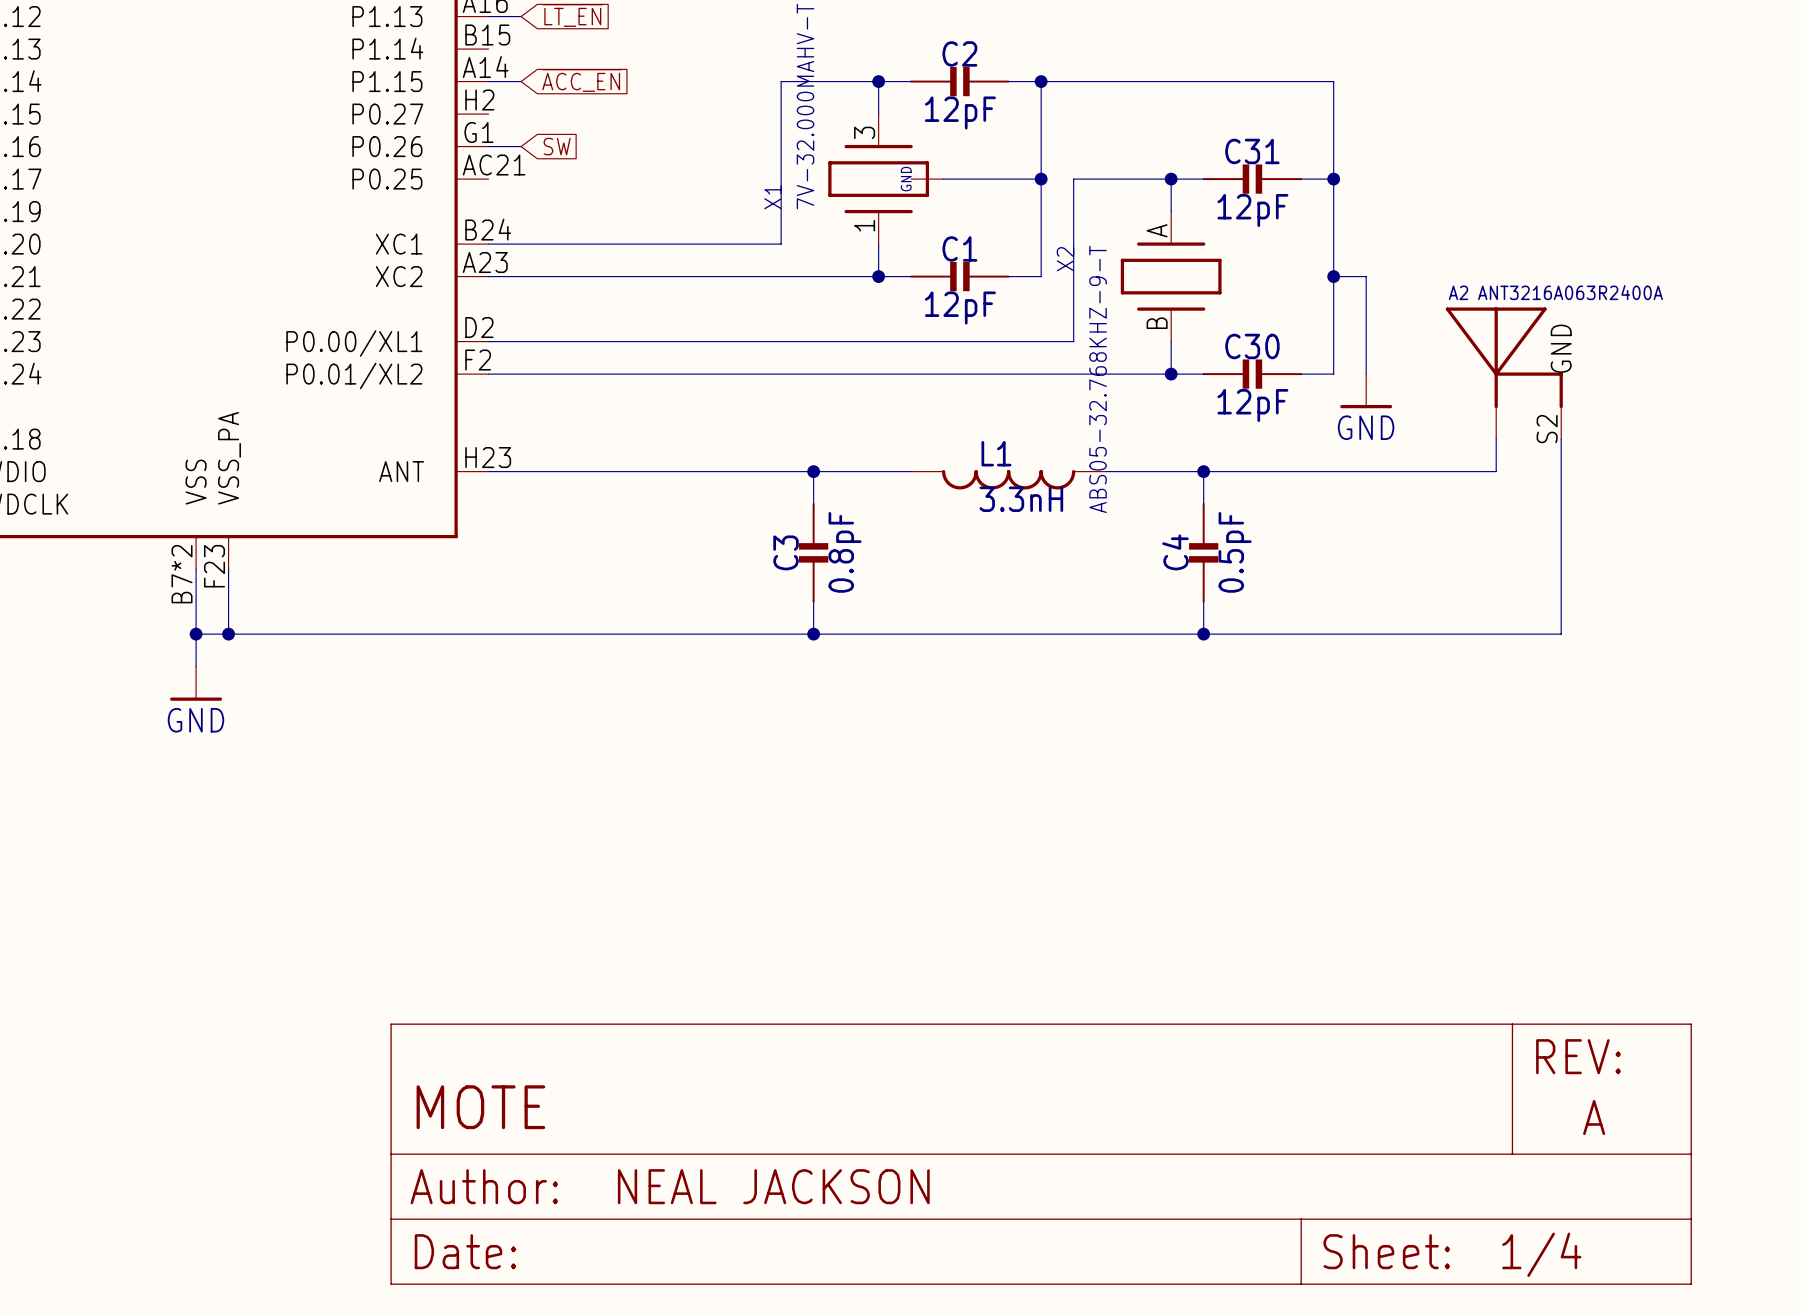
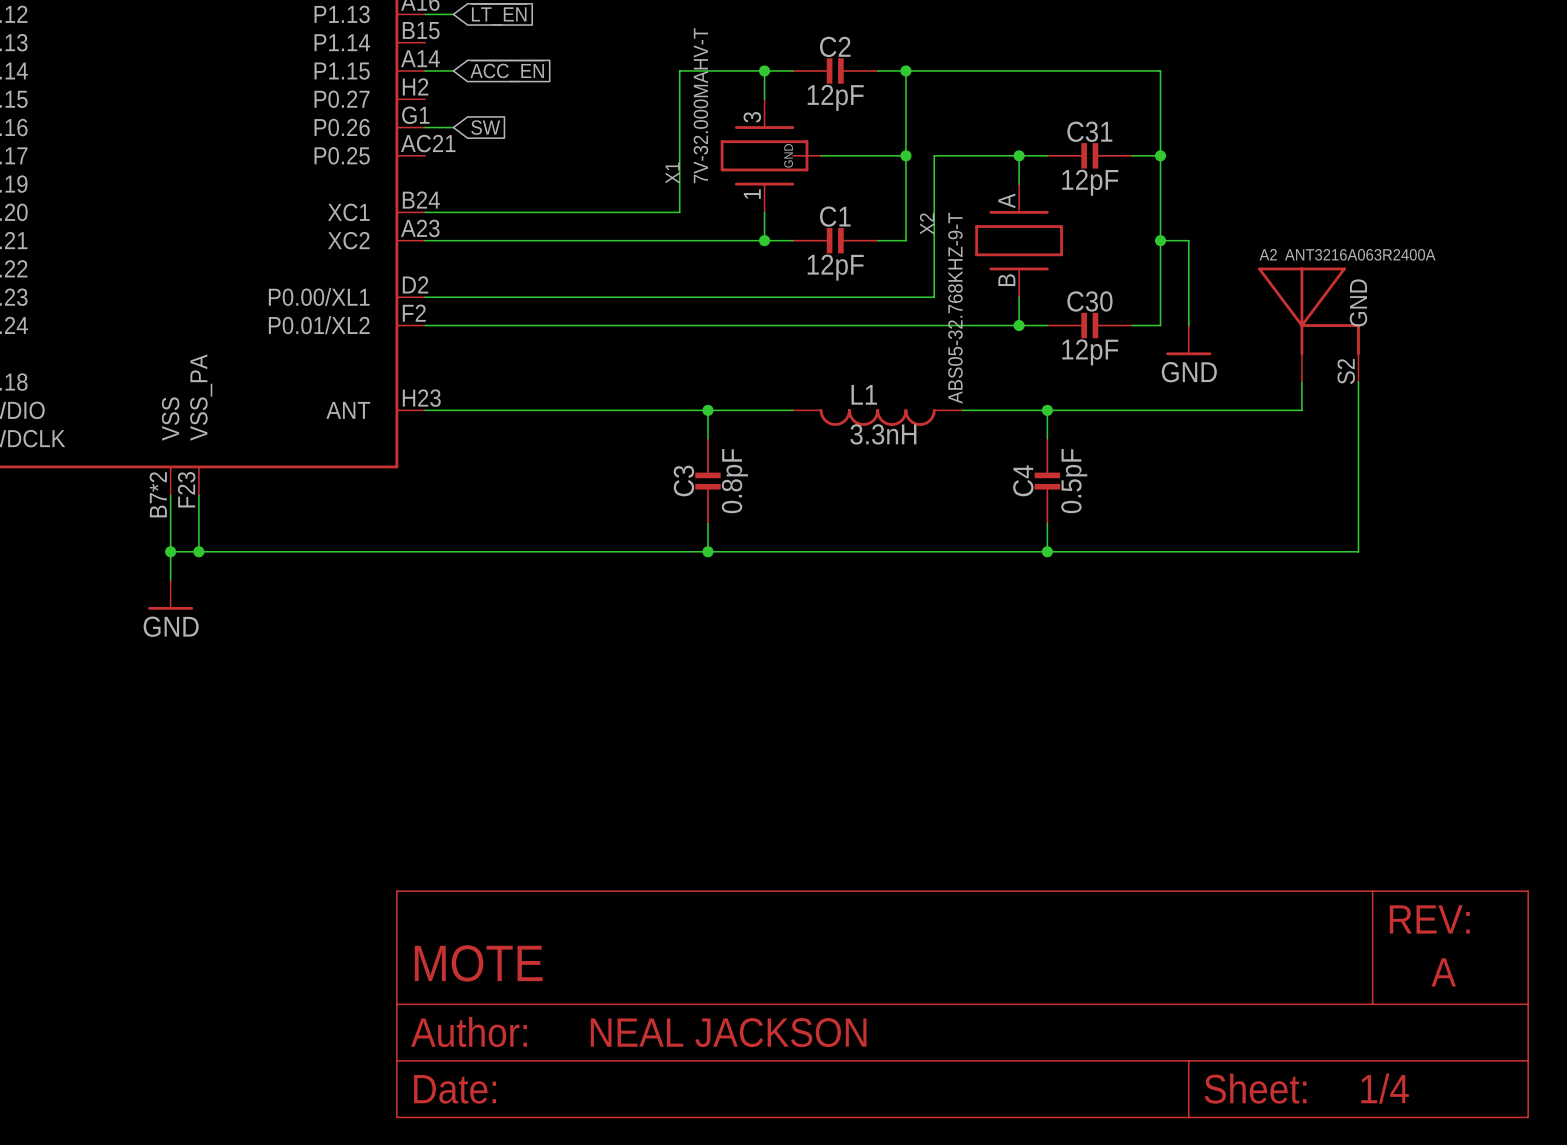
part position: (1041, 1154) -> (962, 1004)

